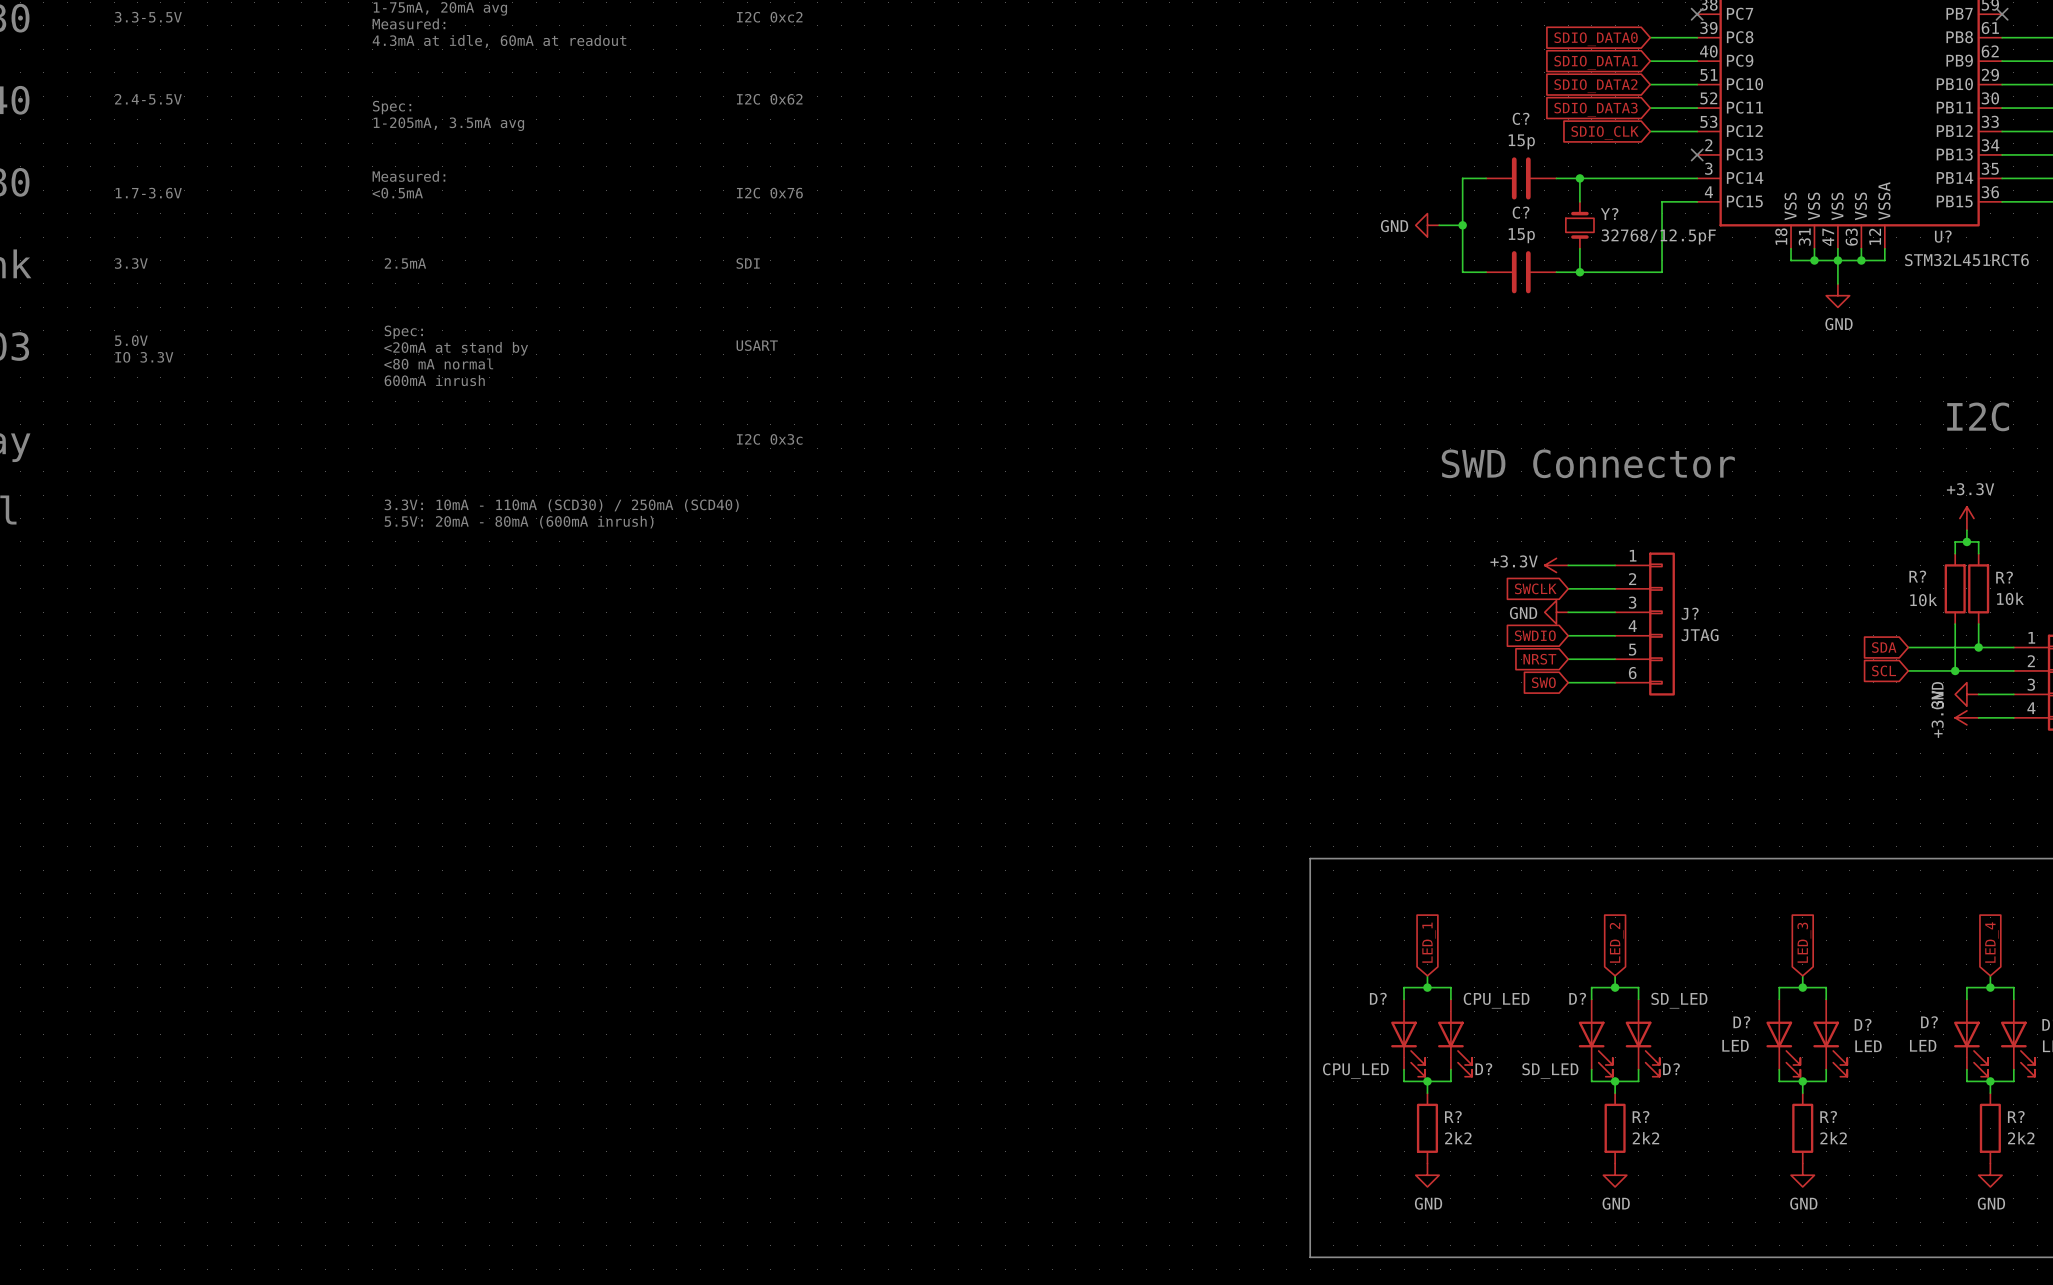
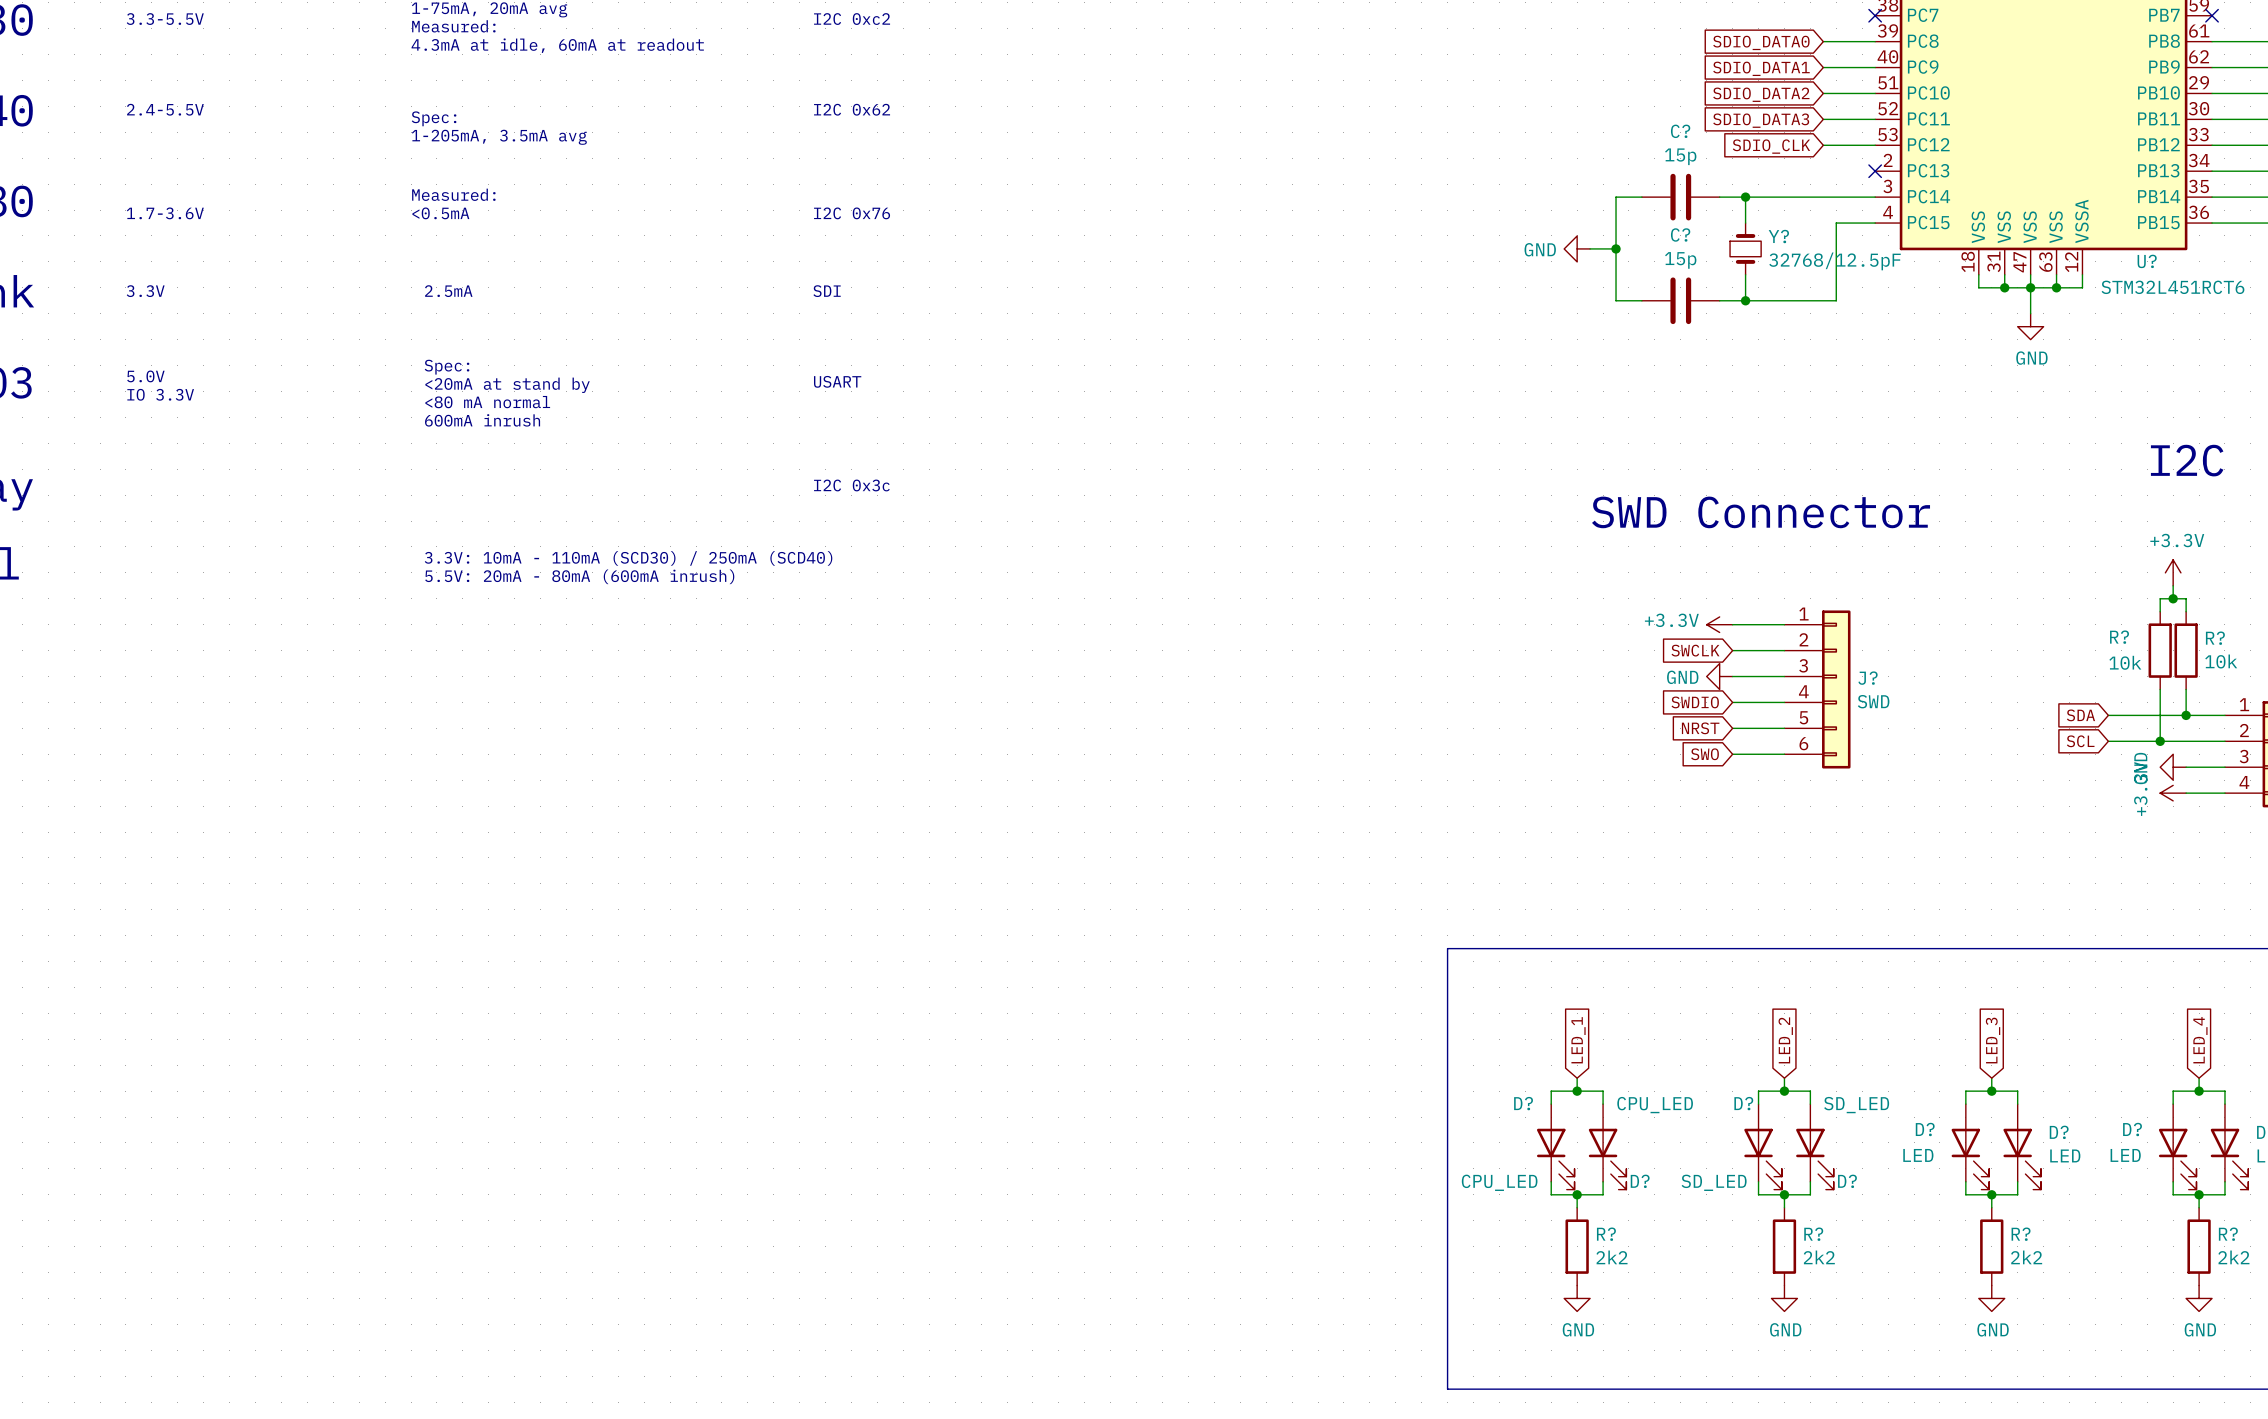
J? value: JTAG (1700, 635) -> SWD (1873, 701)

